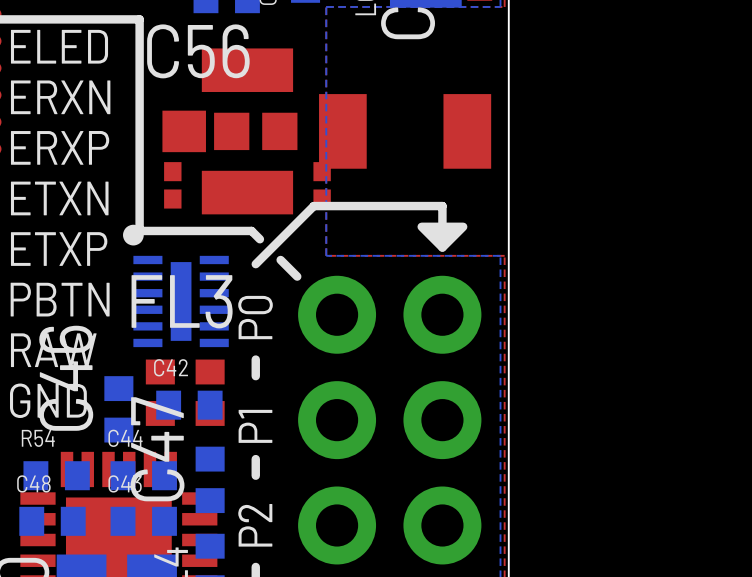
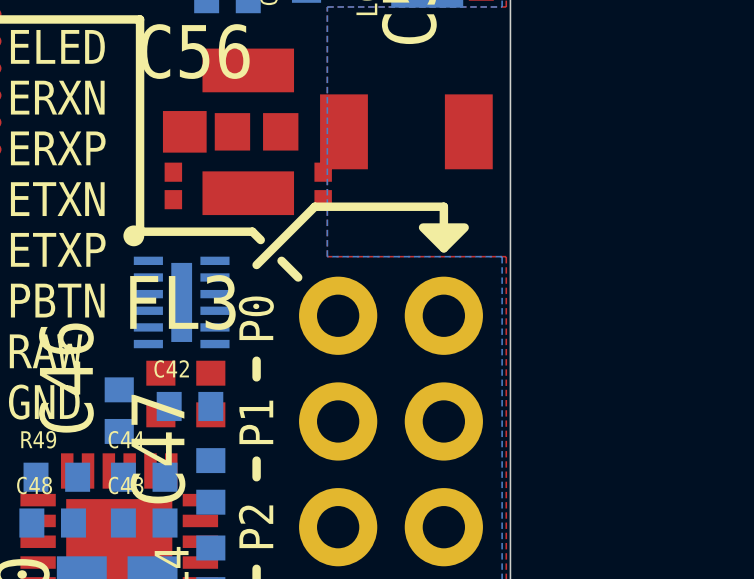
R54 name: R54 (38, 438) -> R49 (38, 439)

